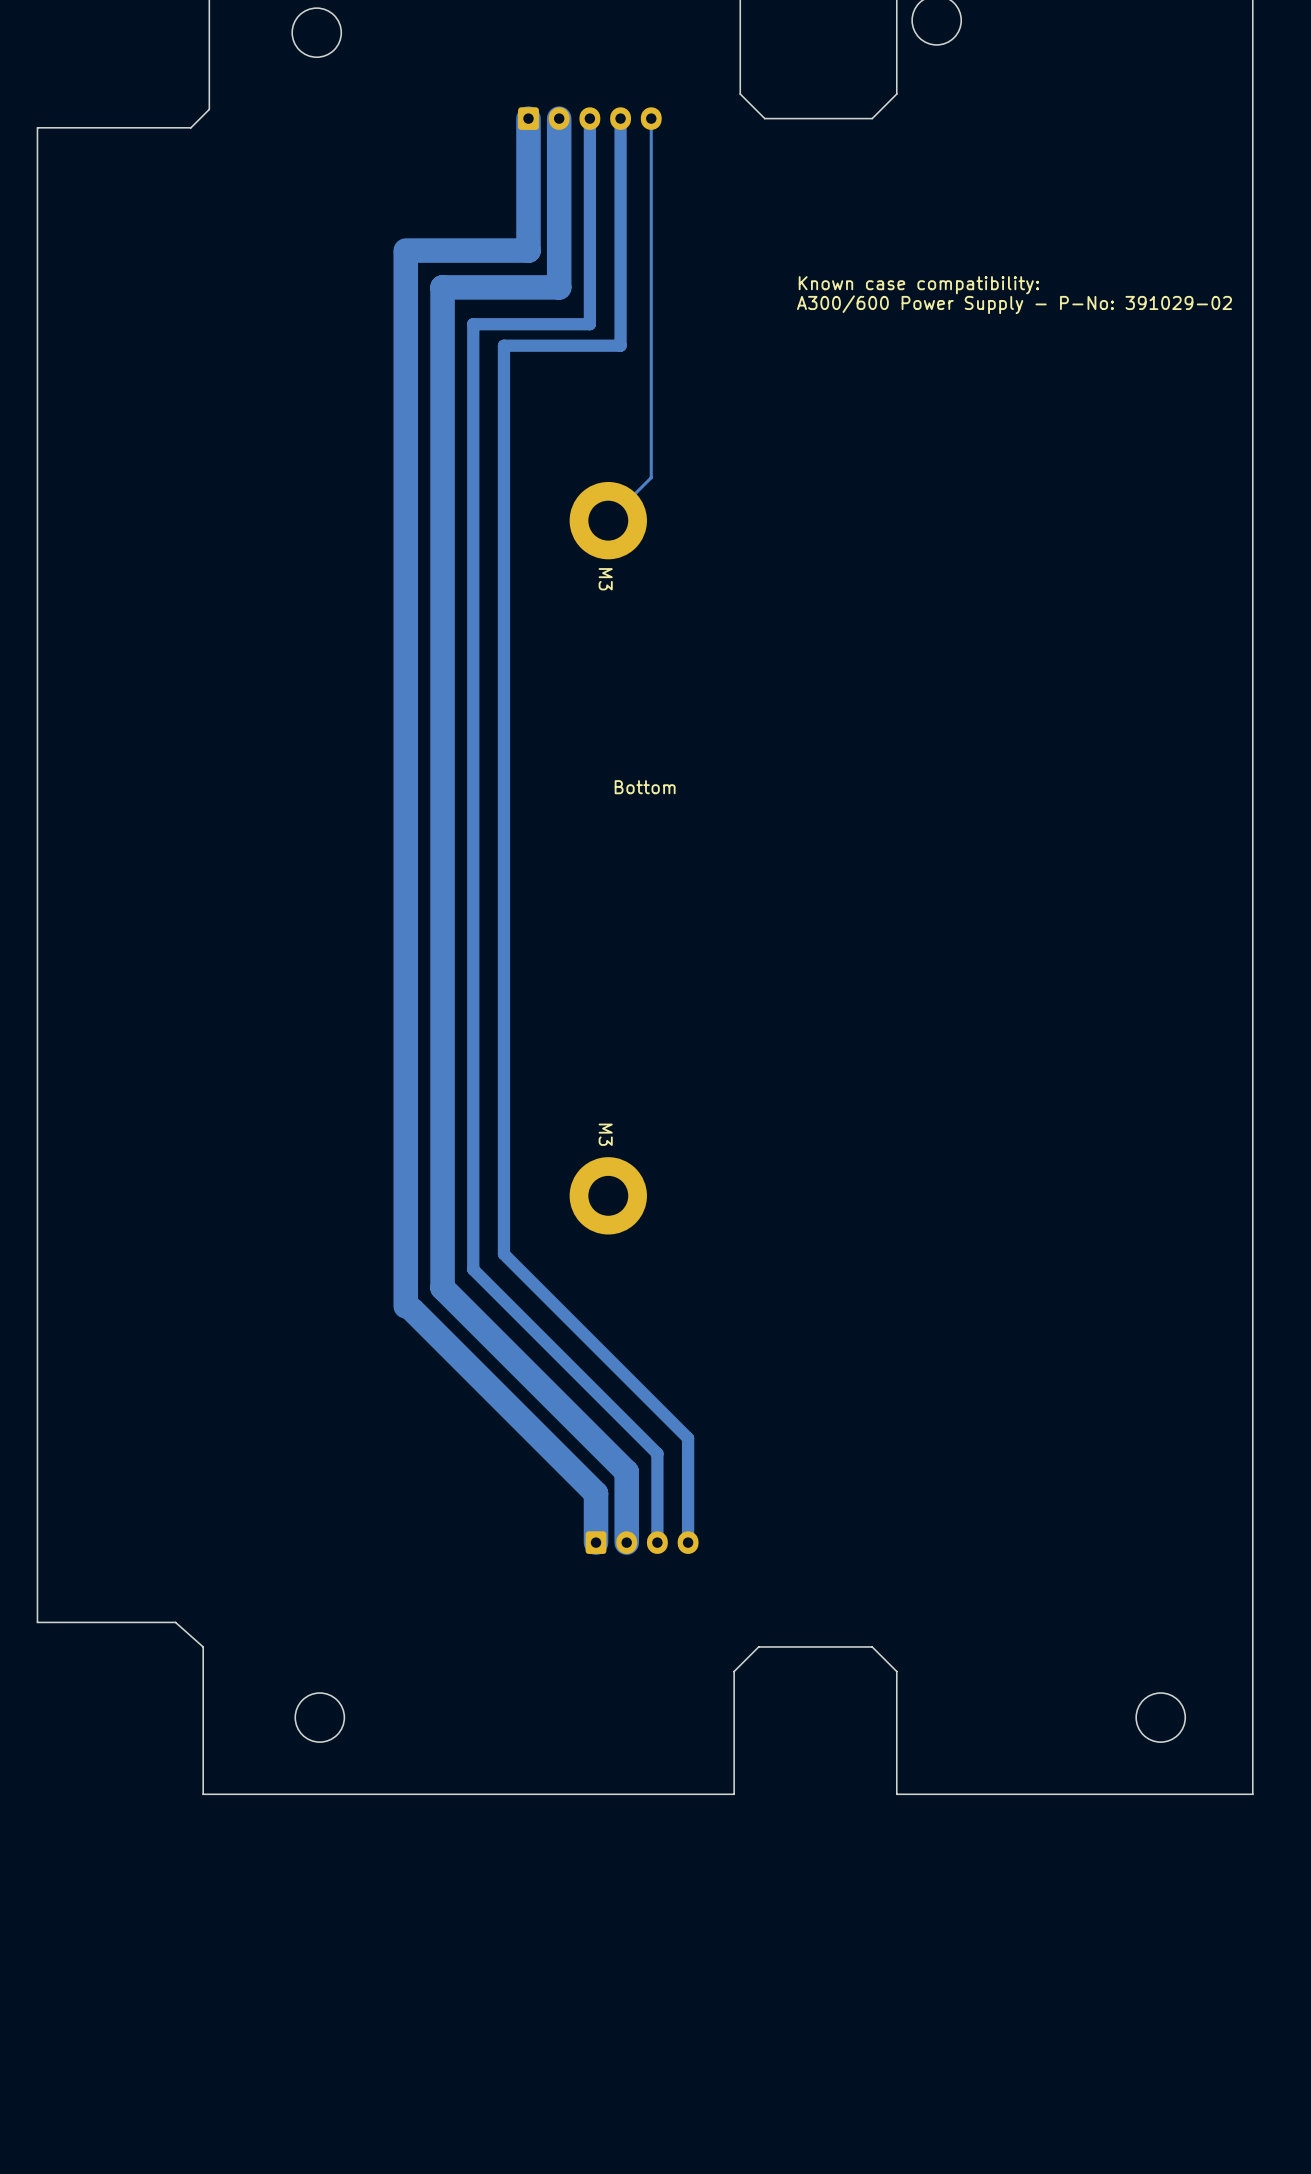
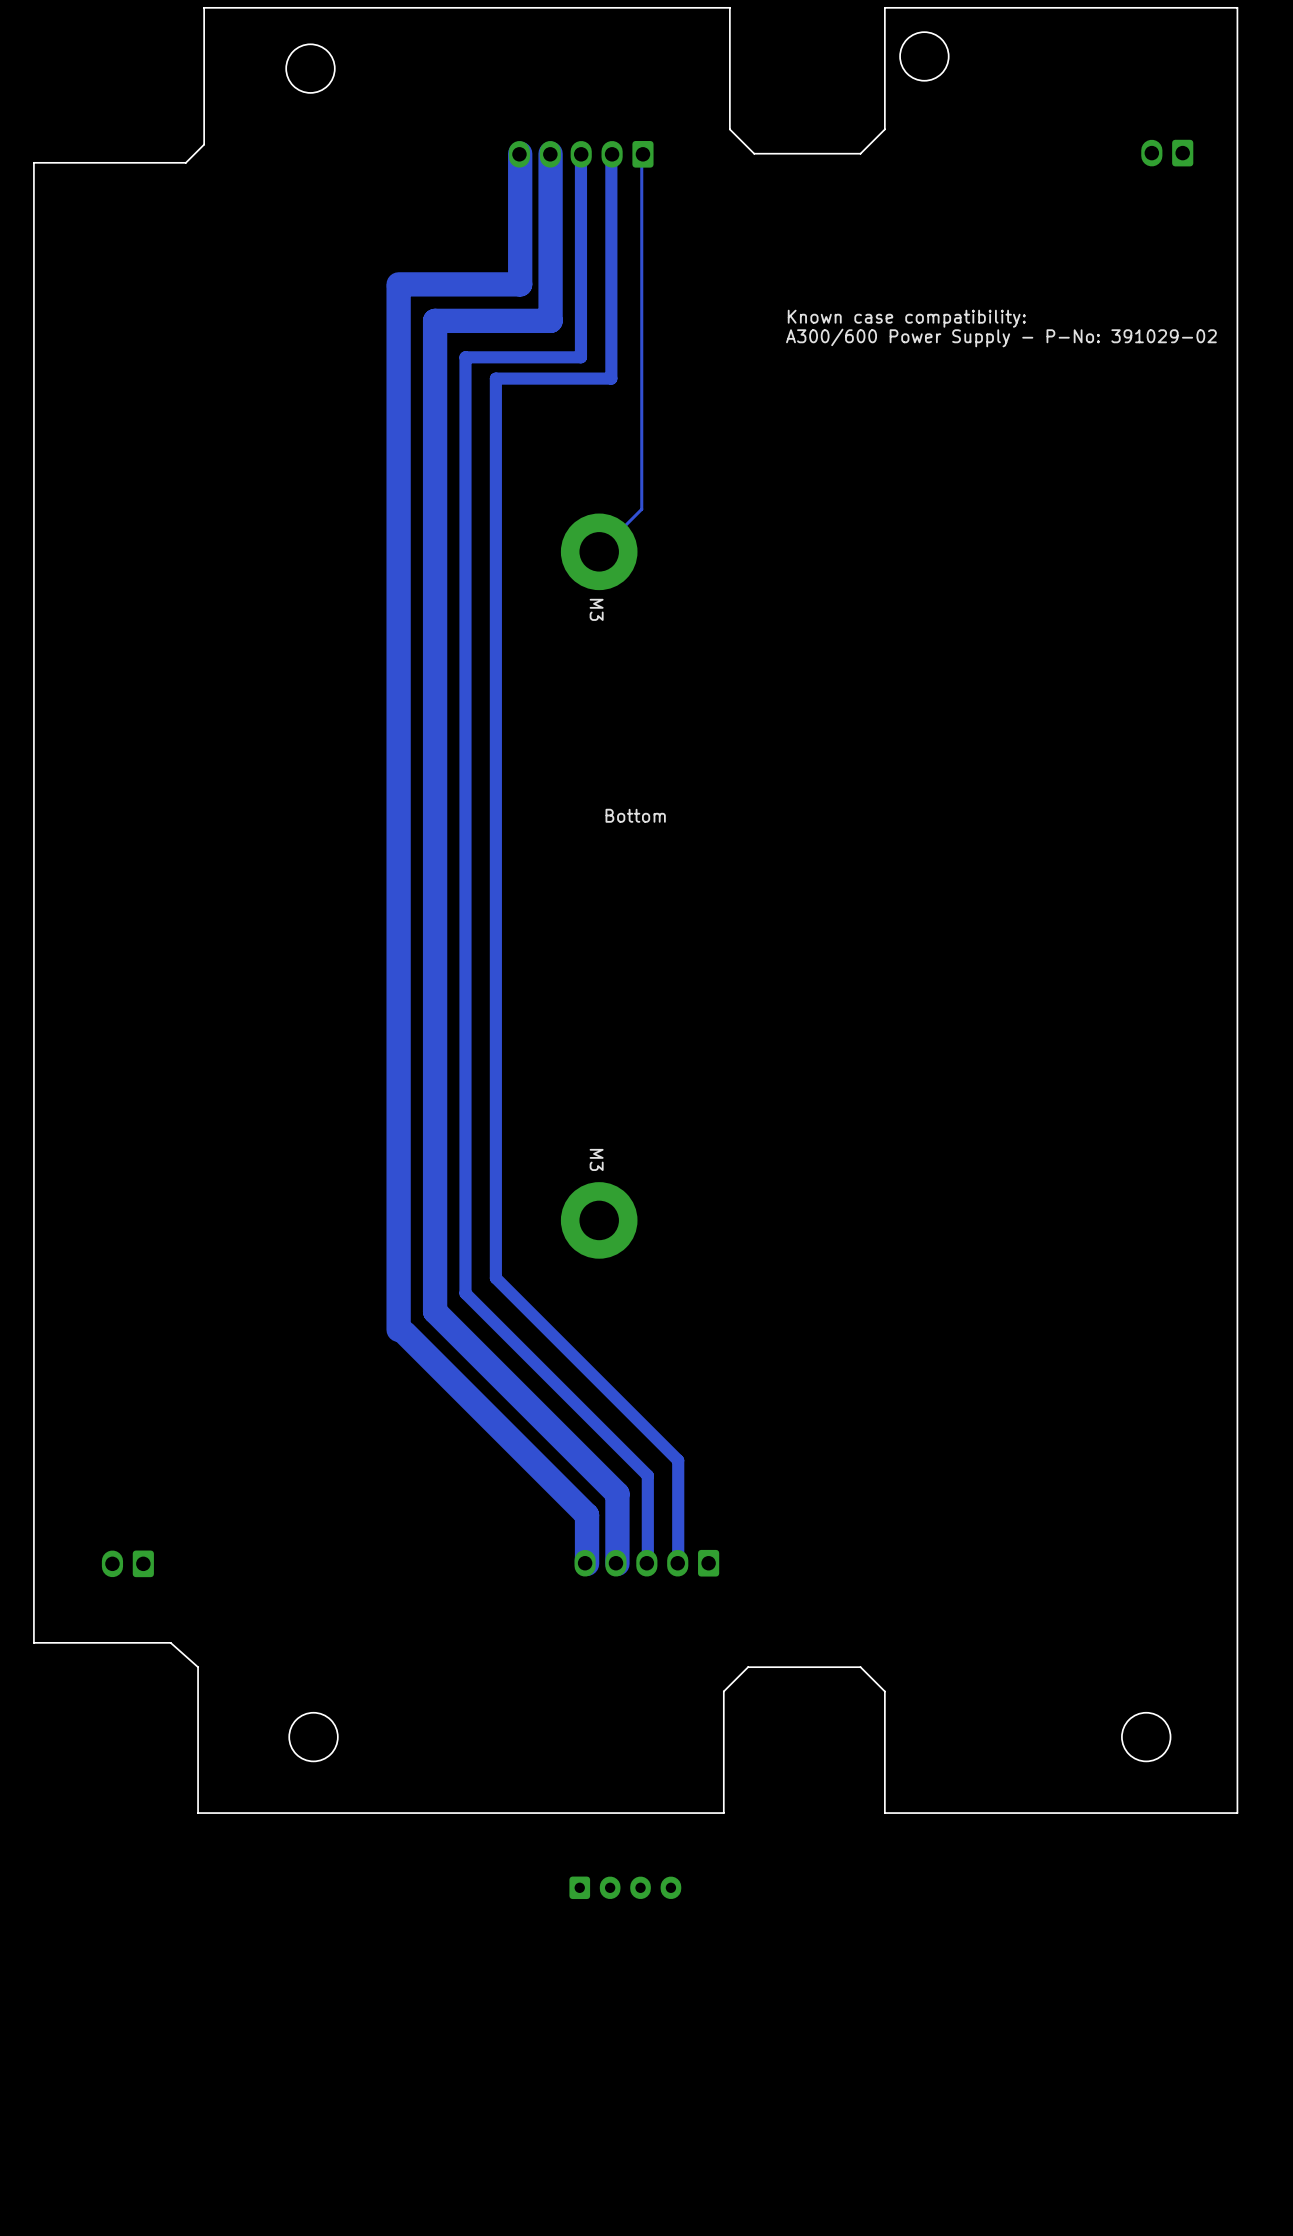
part footprint: [518, 107, 662, 130] -> [508, 141, 654, 168]
part: none -> (1167, 153)
part: none -> (127, 1563)
part: (642, 1542) -> none
part: none -> (646, 1563)
part: none -> (625, 1887)

